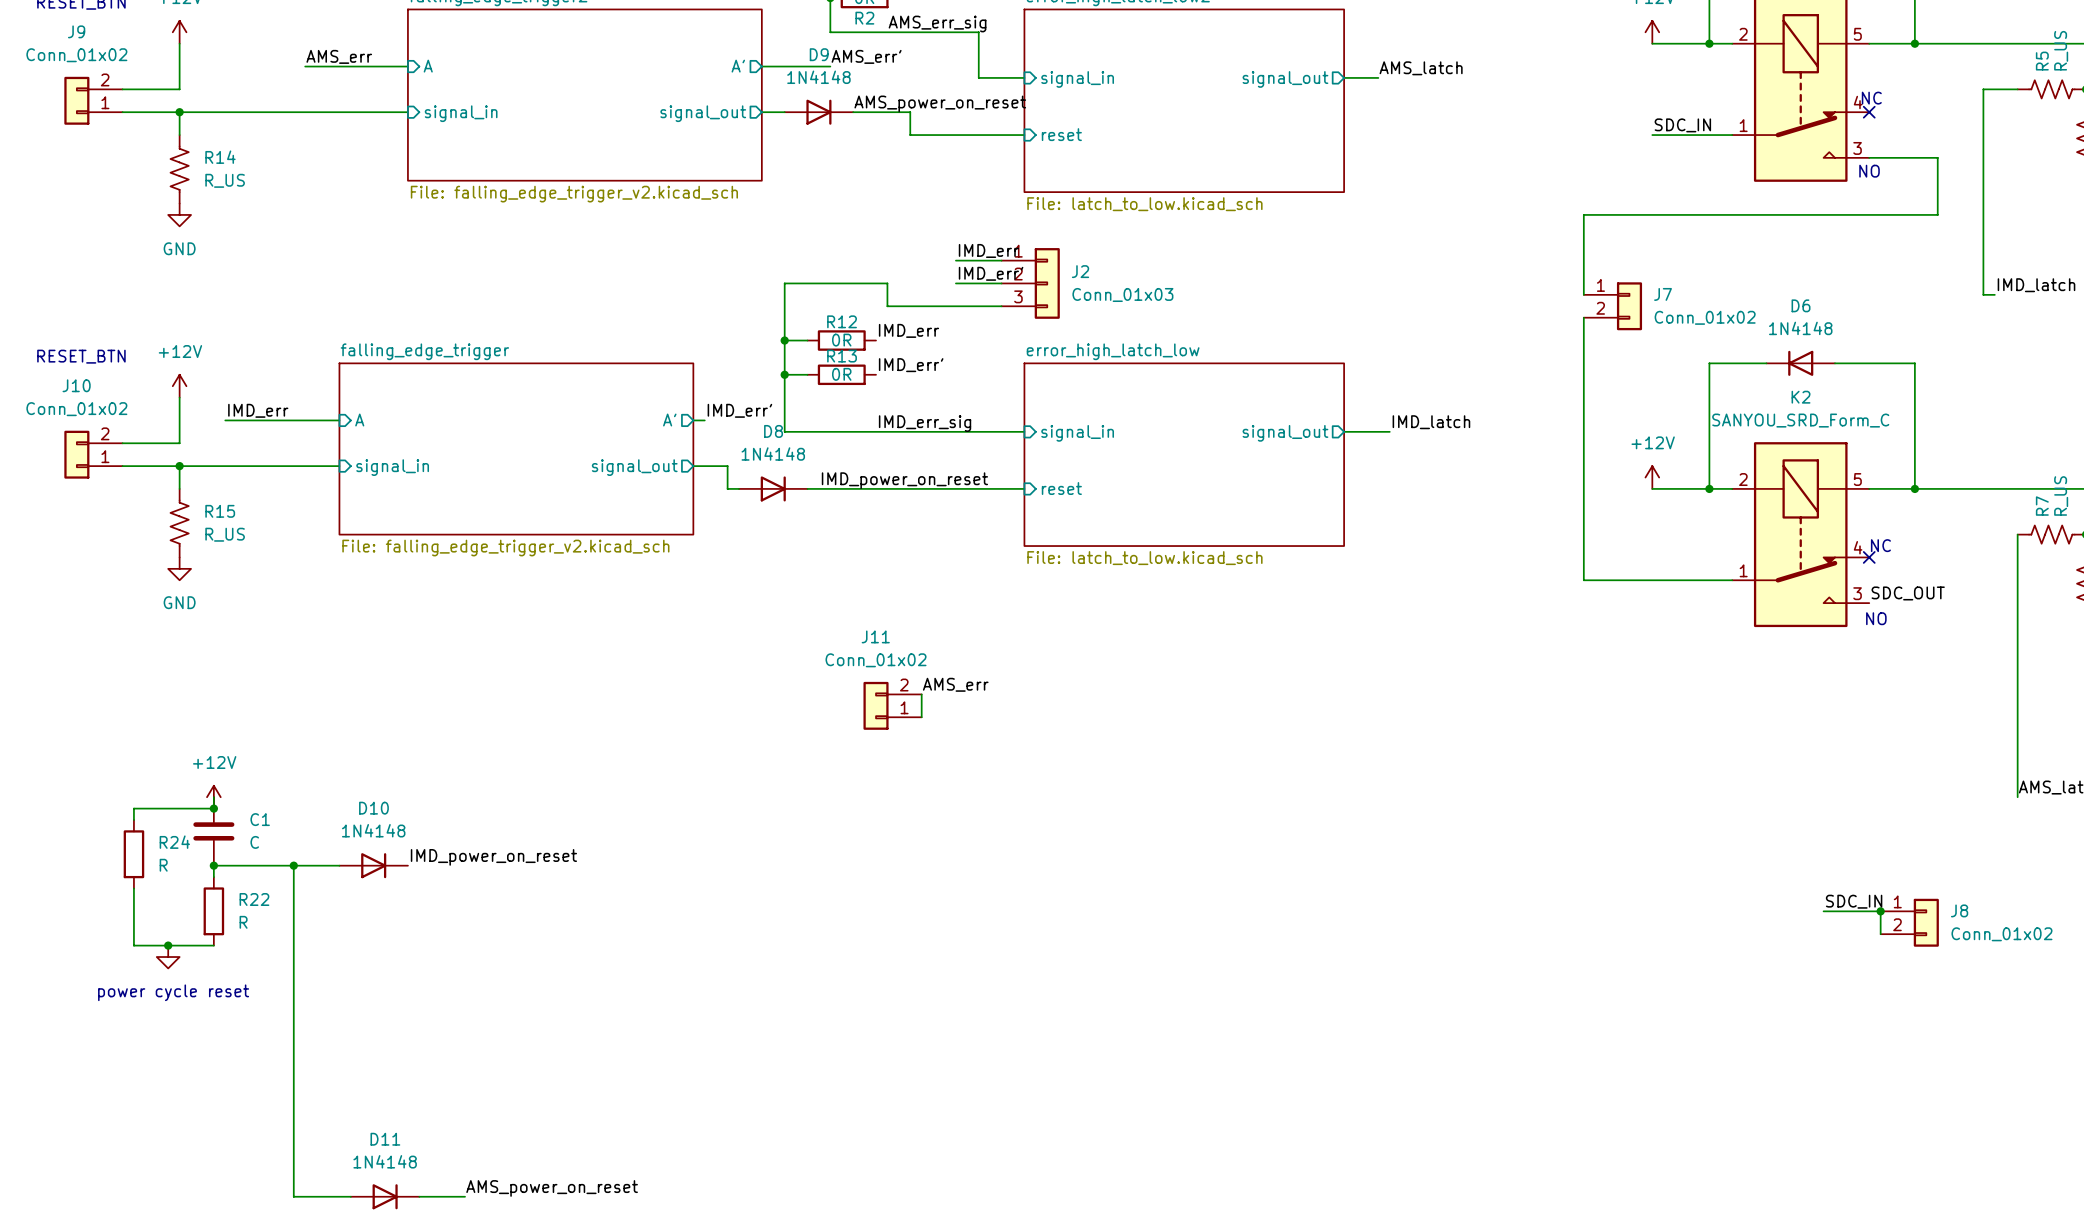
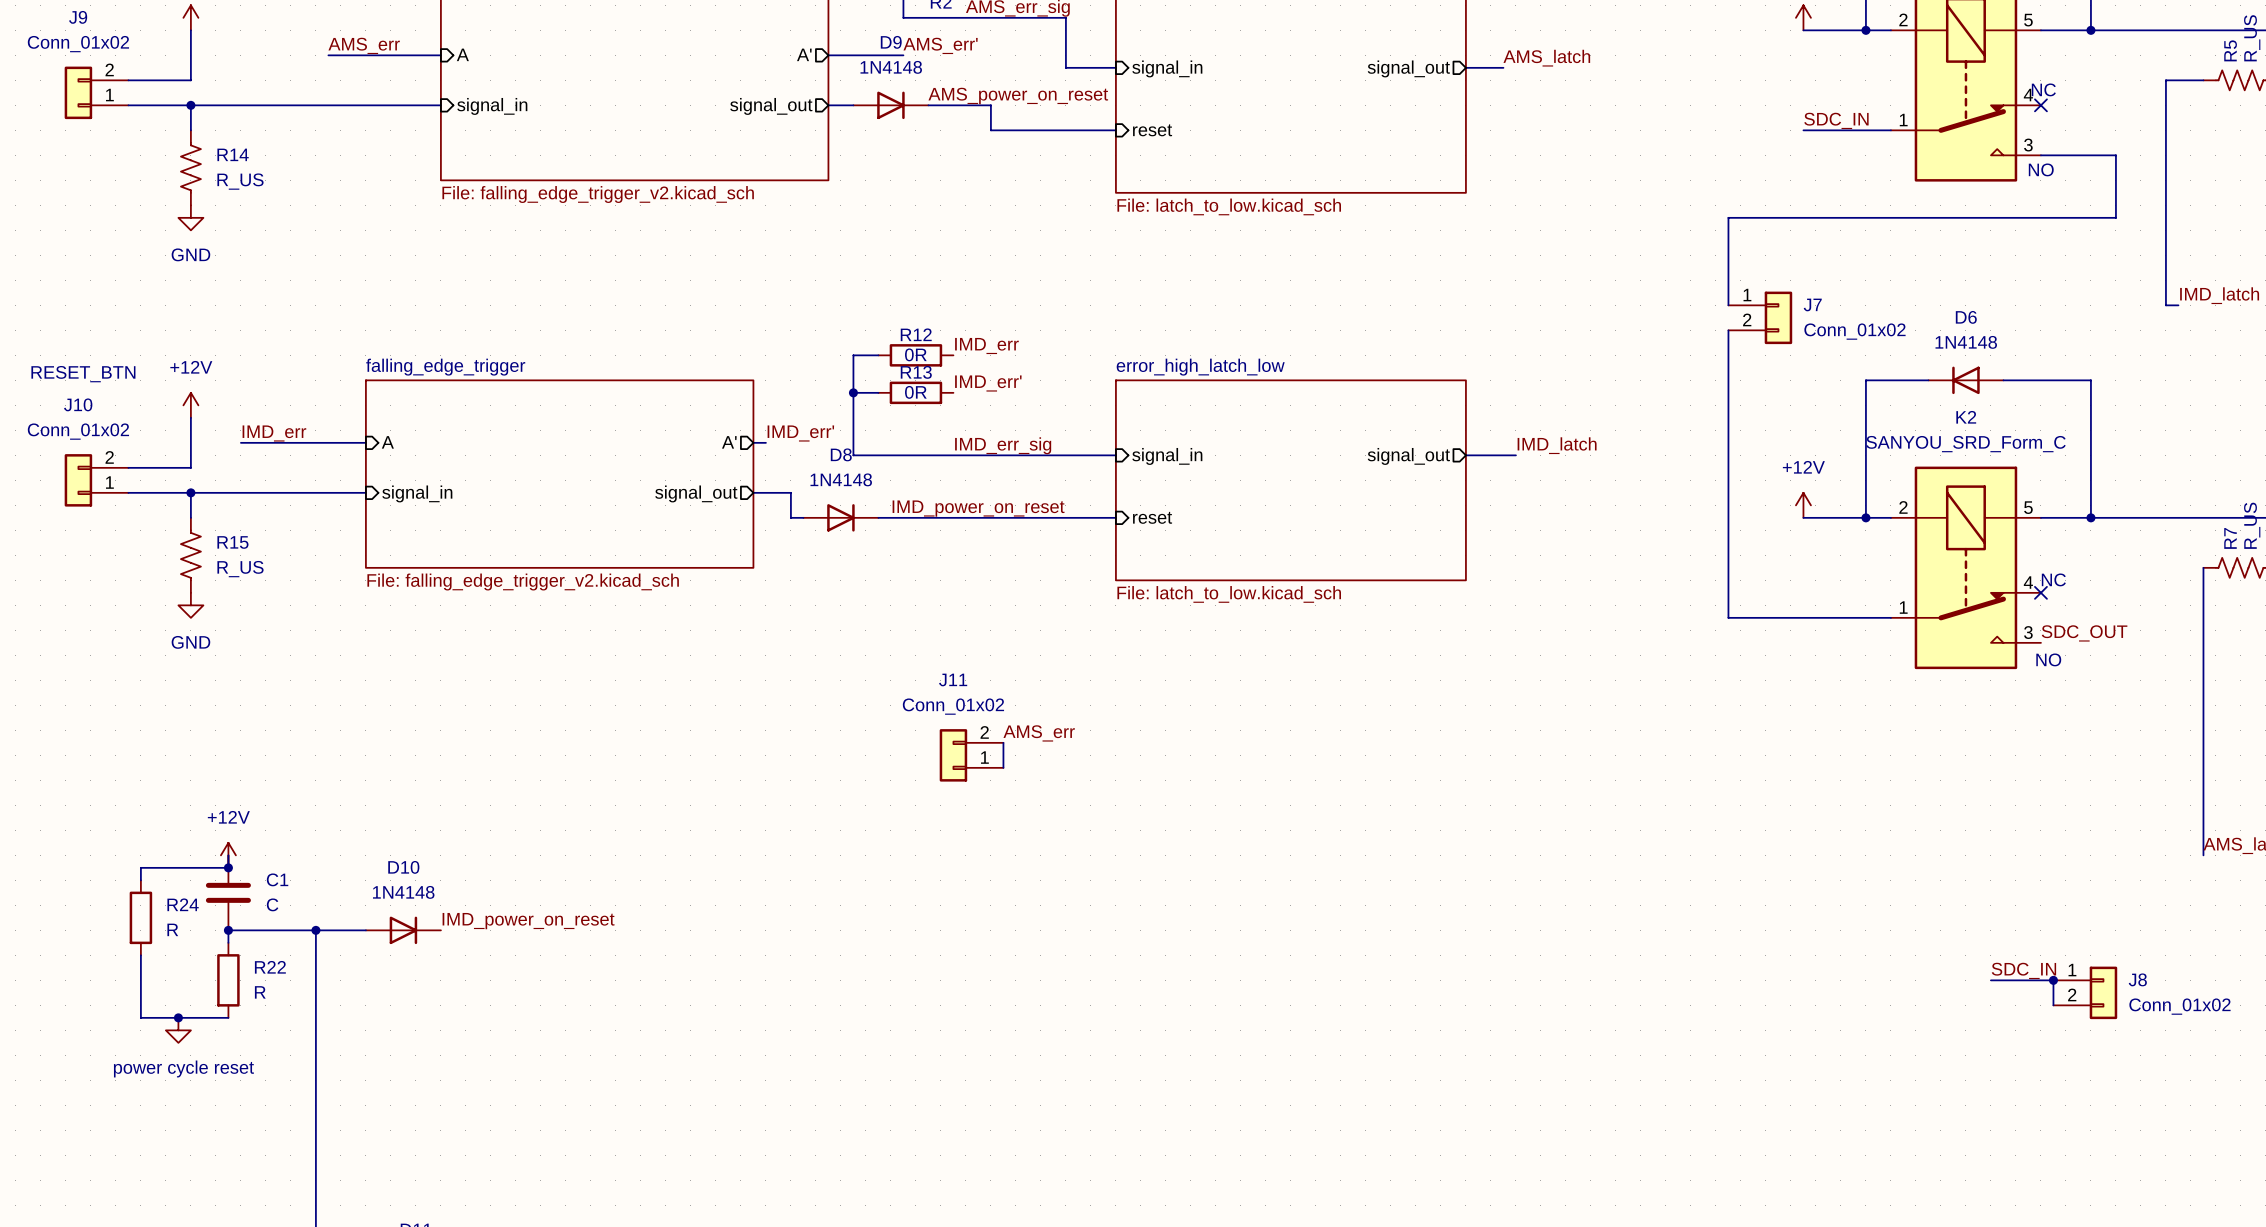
label: IMD_err (988, 250) -> none
wire: (955, 260) (1001, 260) -> none
label: IMD_err' (991, 273) -> none
wire: (955, 283) (1001, 283) -> none
J2: Conn_01x03 (1030, 283) -> none
wire: (1001, 306) (887, 306) (887, 283) (784, 283) (784, 340) -> none
junction: (784, 340) -> none

